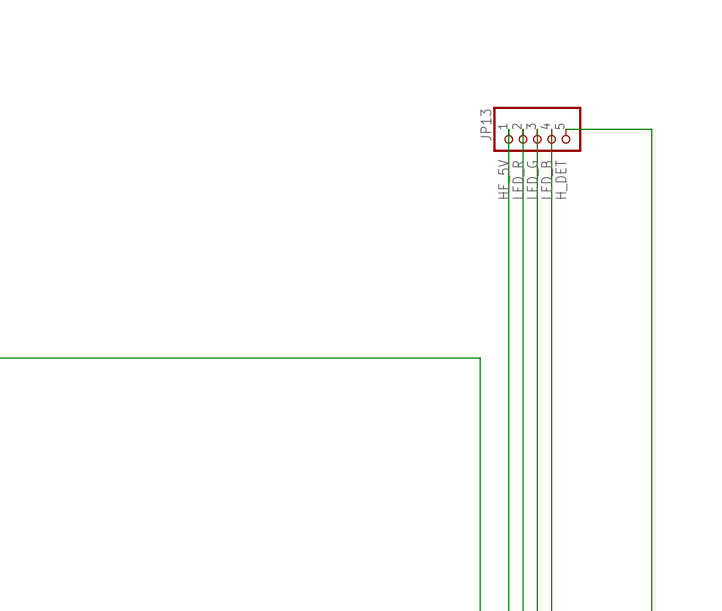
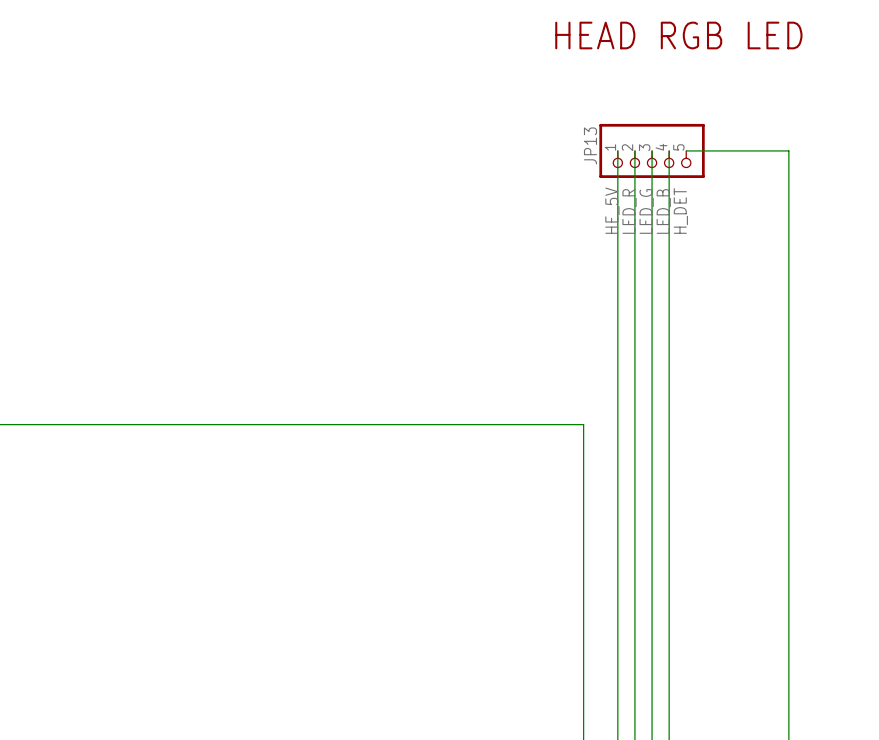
text: none -> HEAD RGB LED (678, 35)

